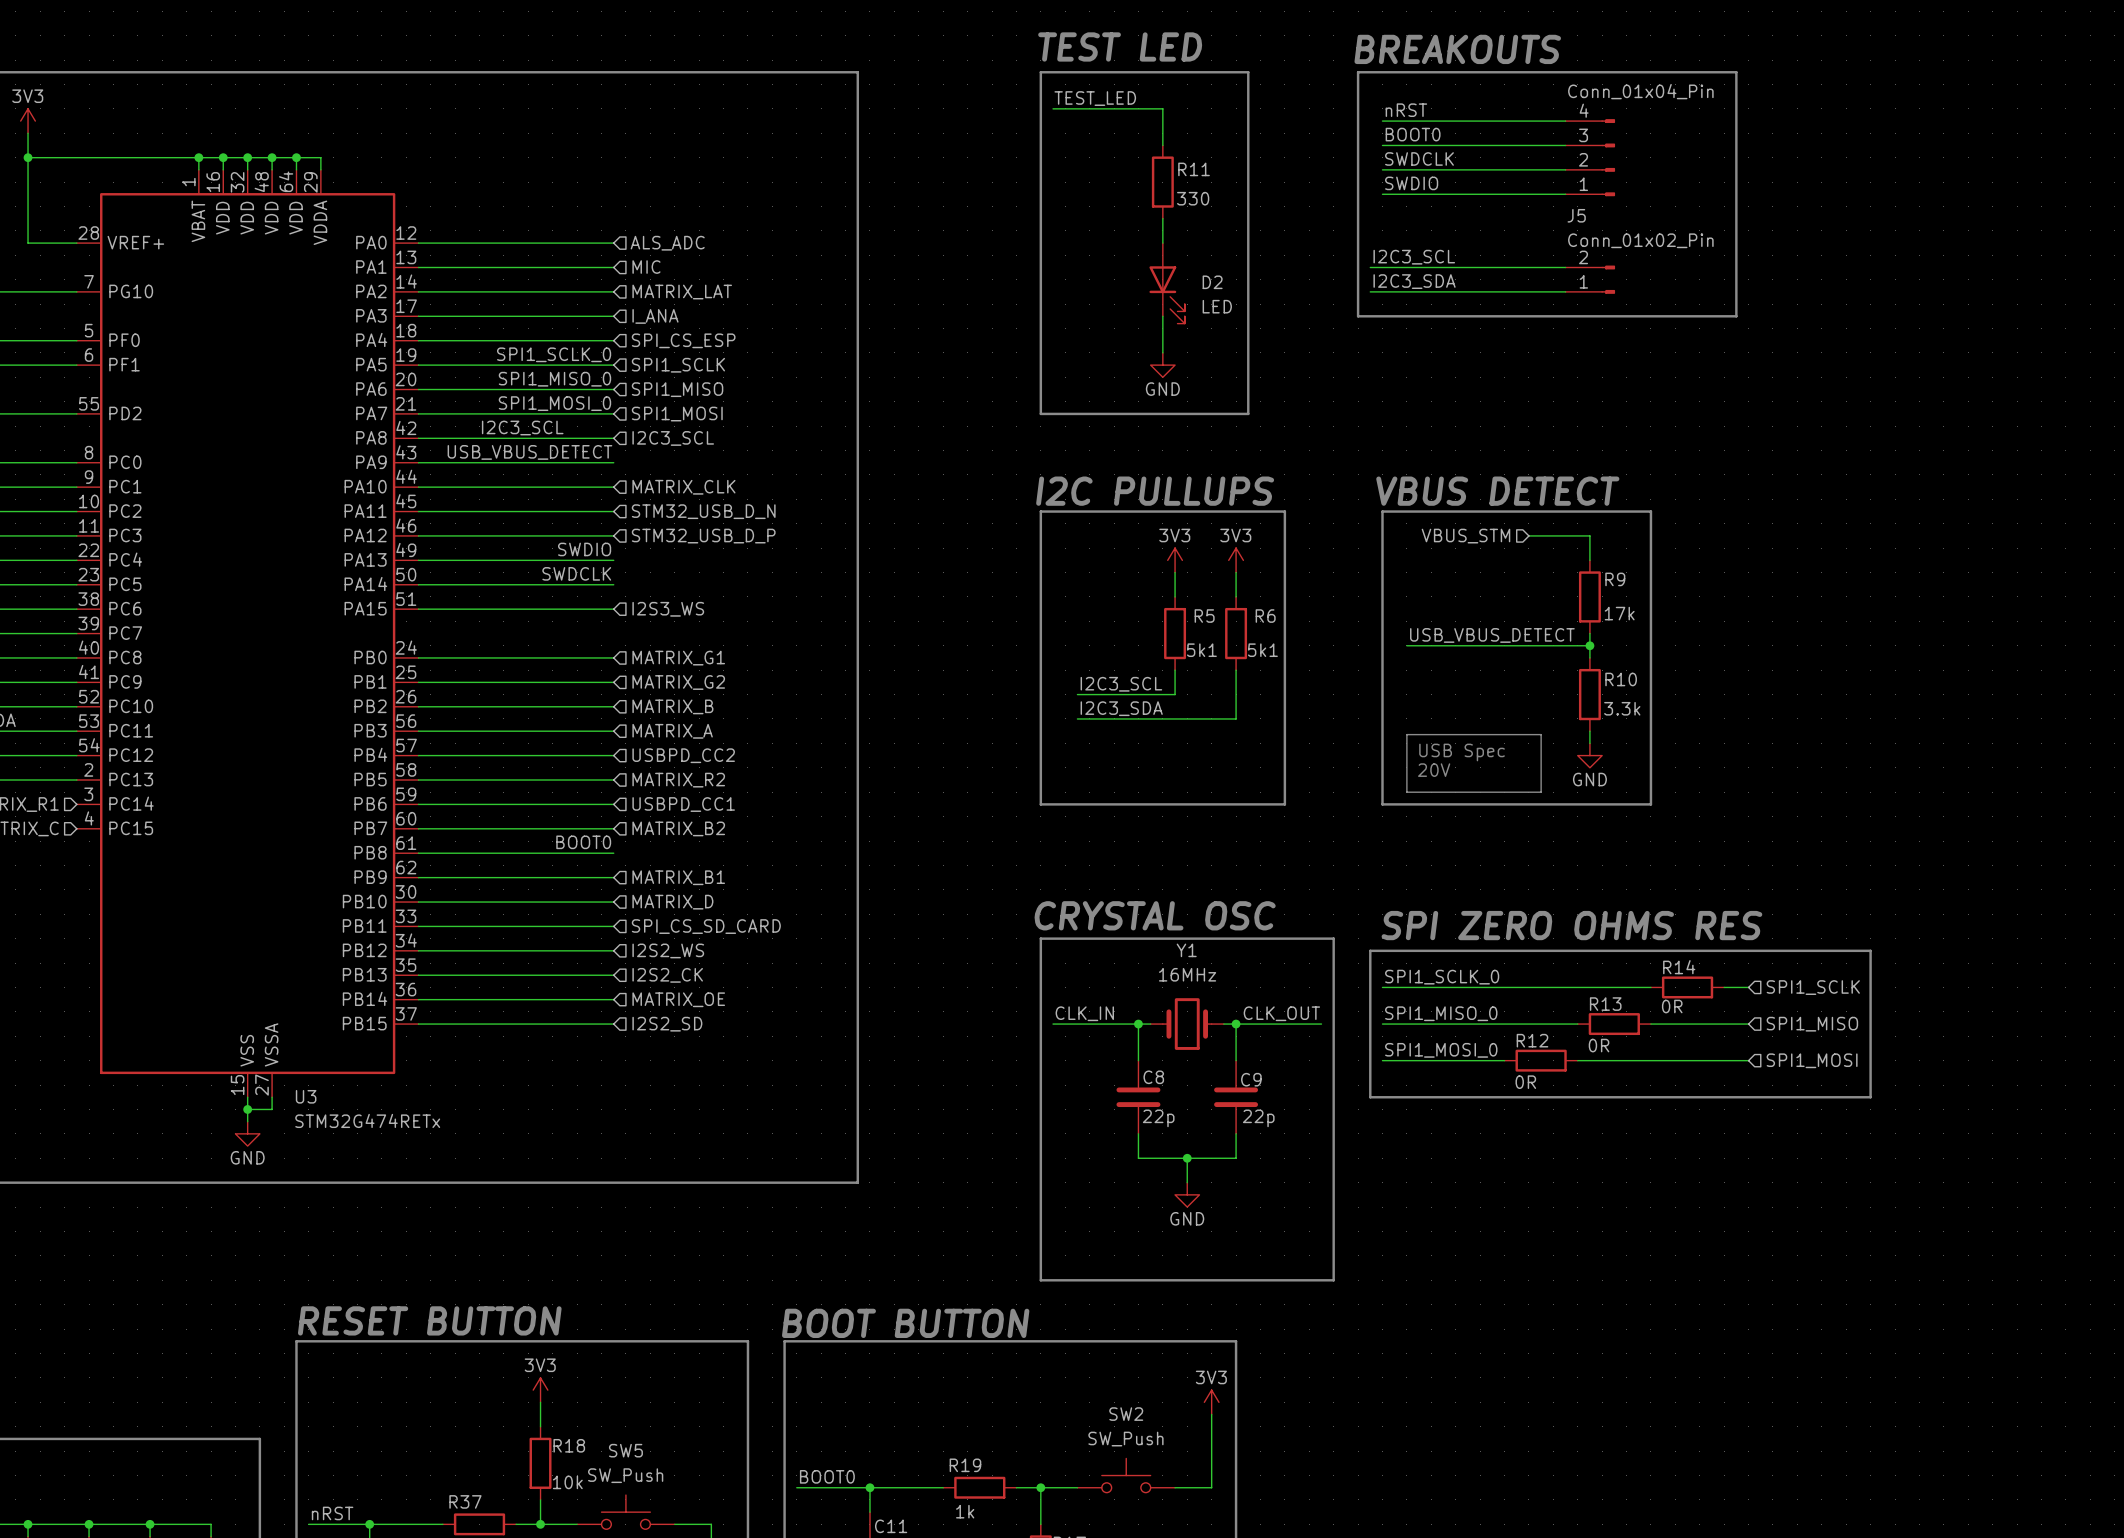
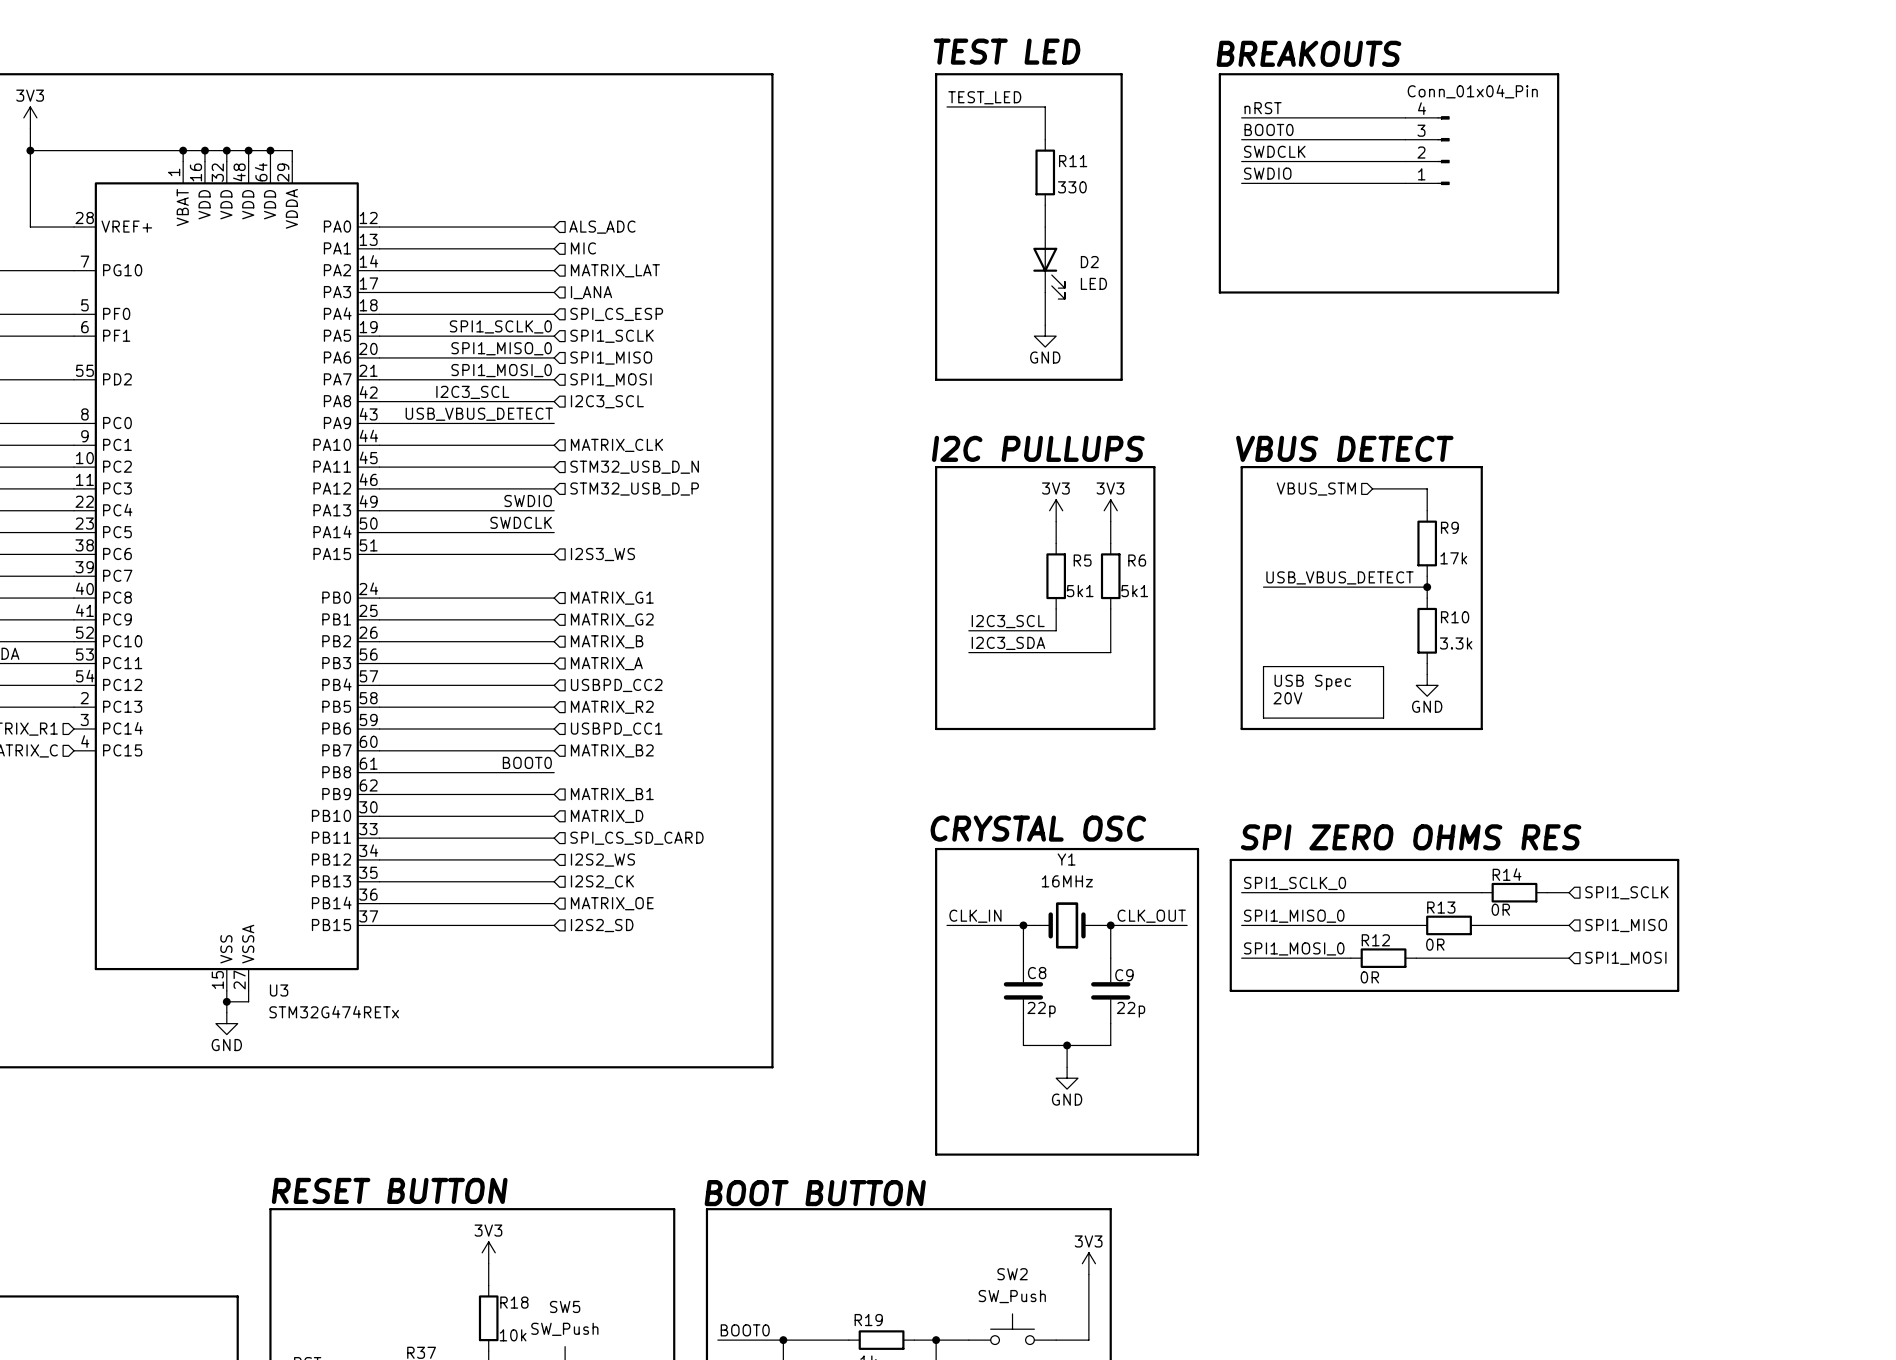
label: I2C3_SCL (1414, 257) -> none
wire: (1370, 267) (1565, 267) -> none
J5: Conn_01x02_Pin (1590, 279) -> none
label: I2C3_SDA (1414, 281) -> none
wire: (1370, 291) (1565, 291) -> none

